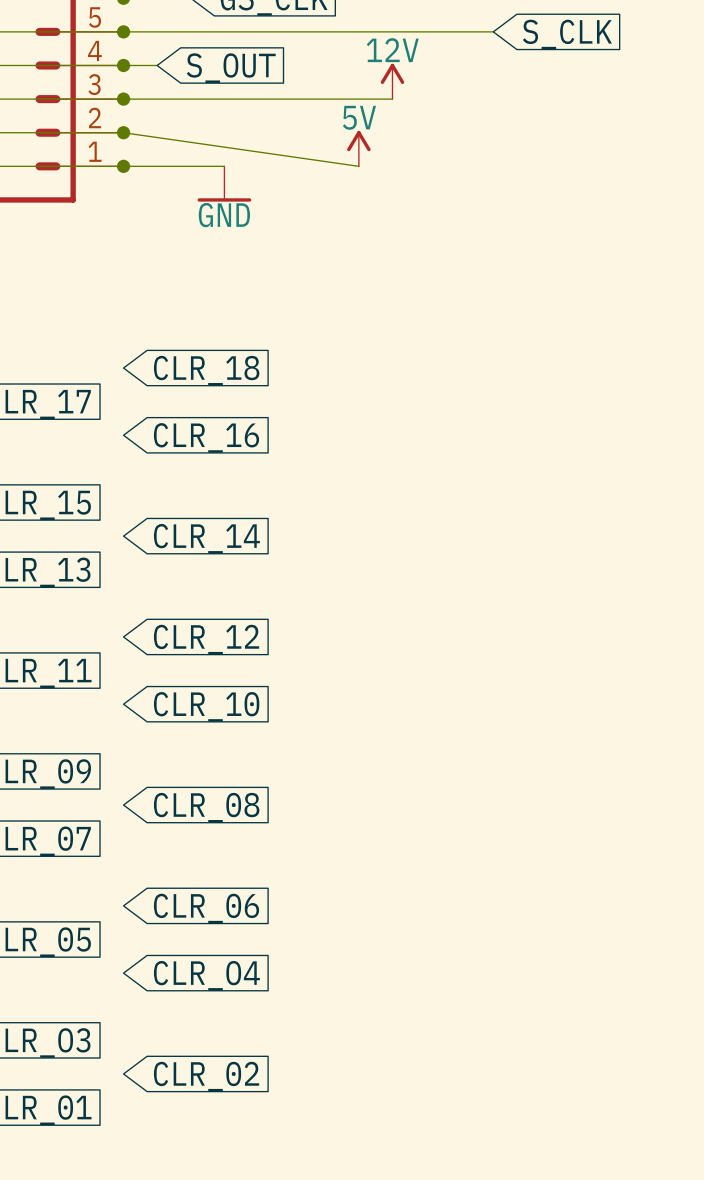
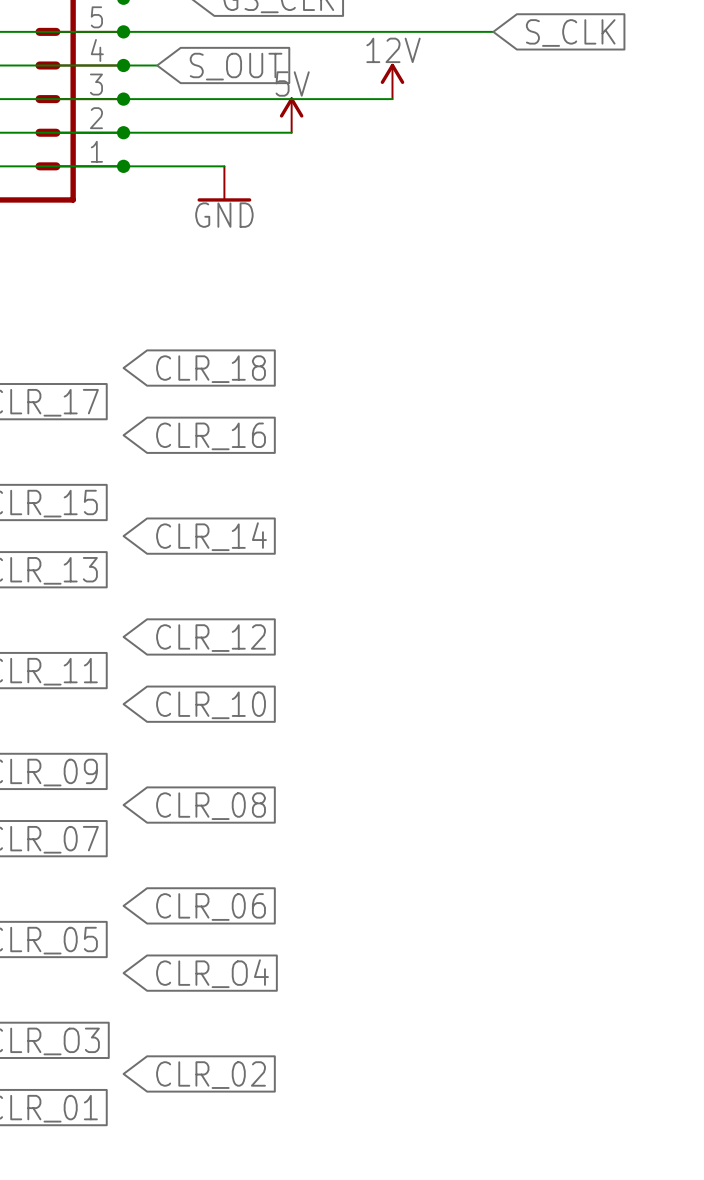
wire: (123, 132) (358, 166) -> (123, 132) (291, 132)
power symbol position: 5V (358, 148) -> 5V (291, 115)

